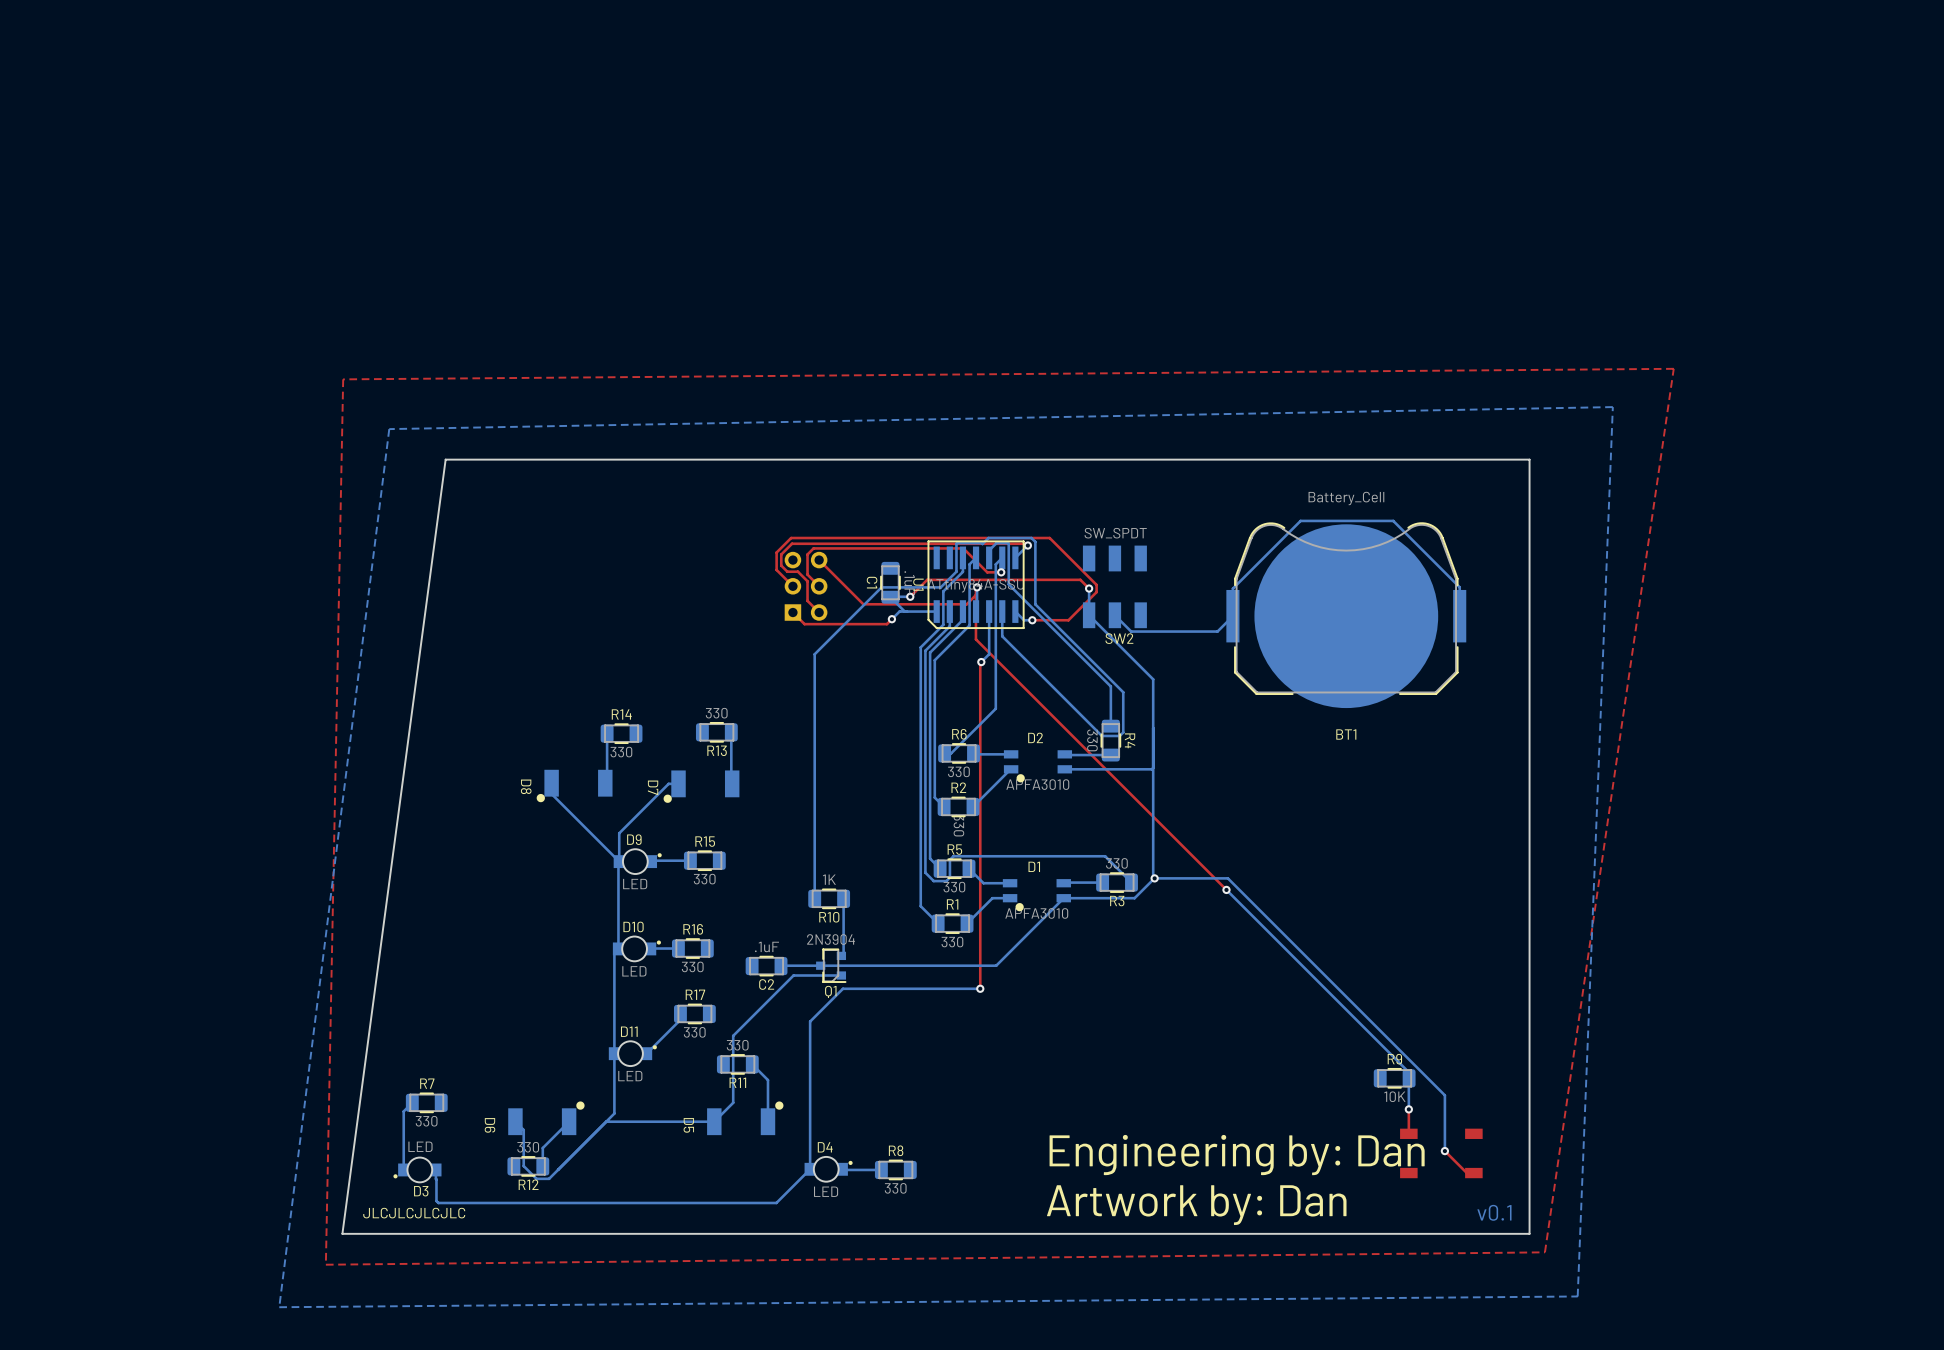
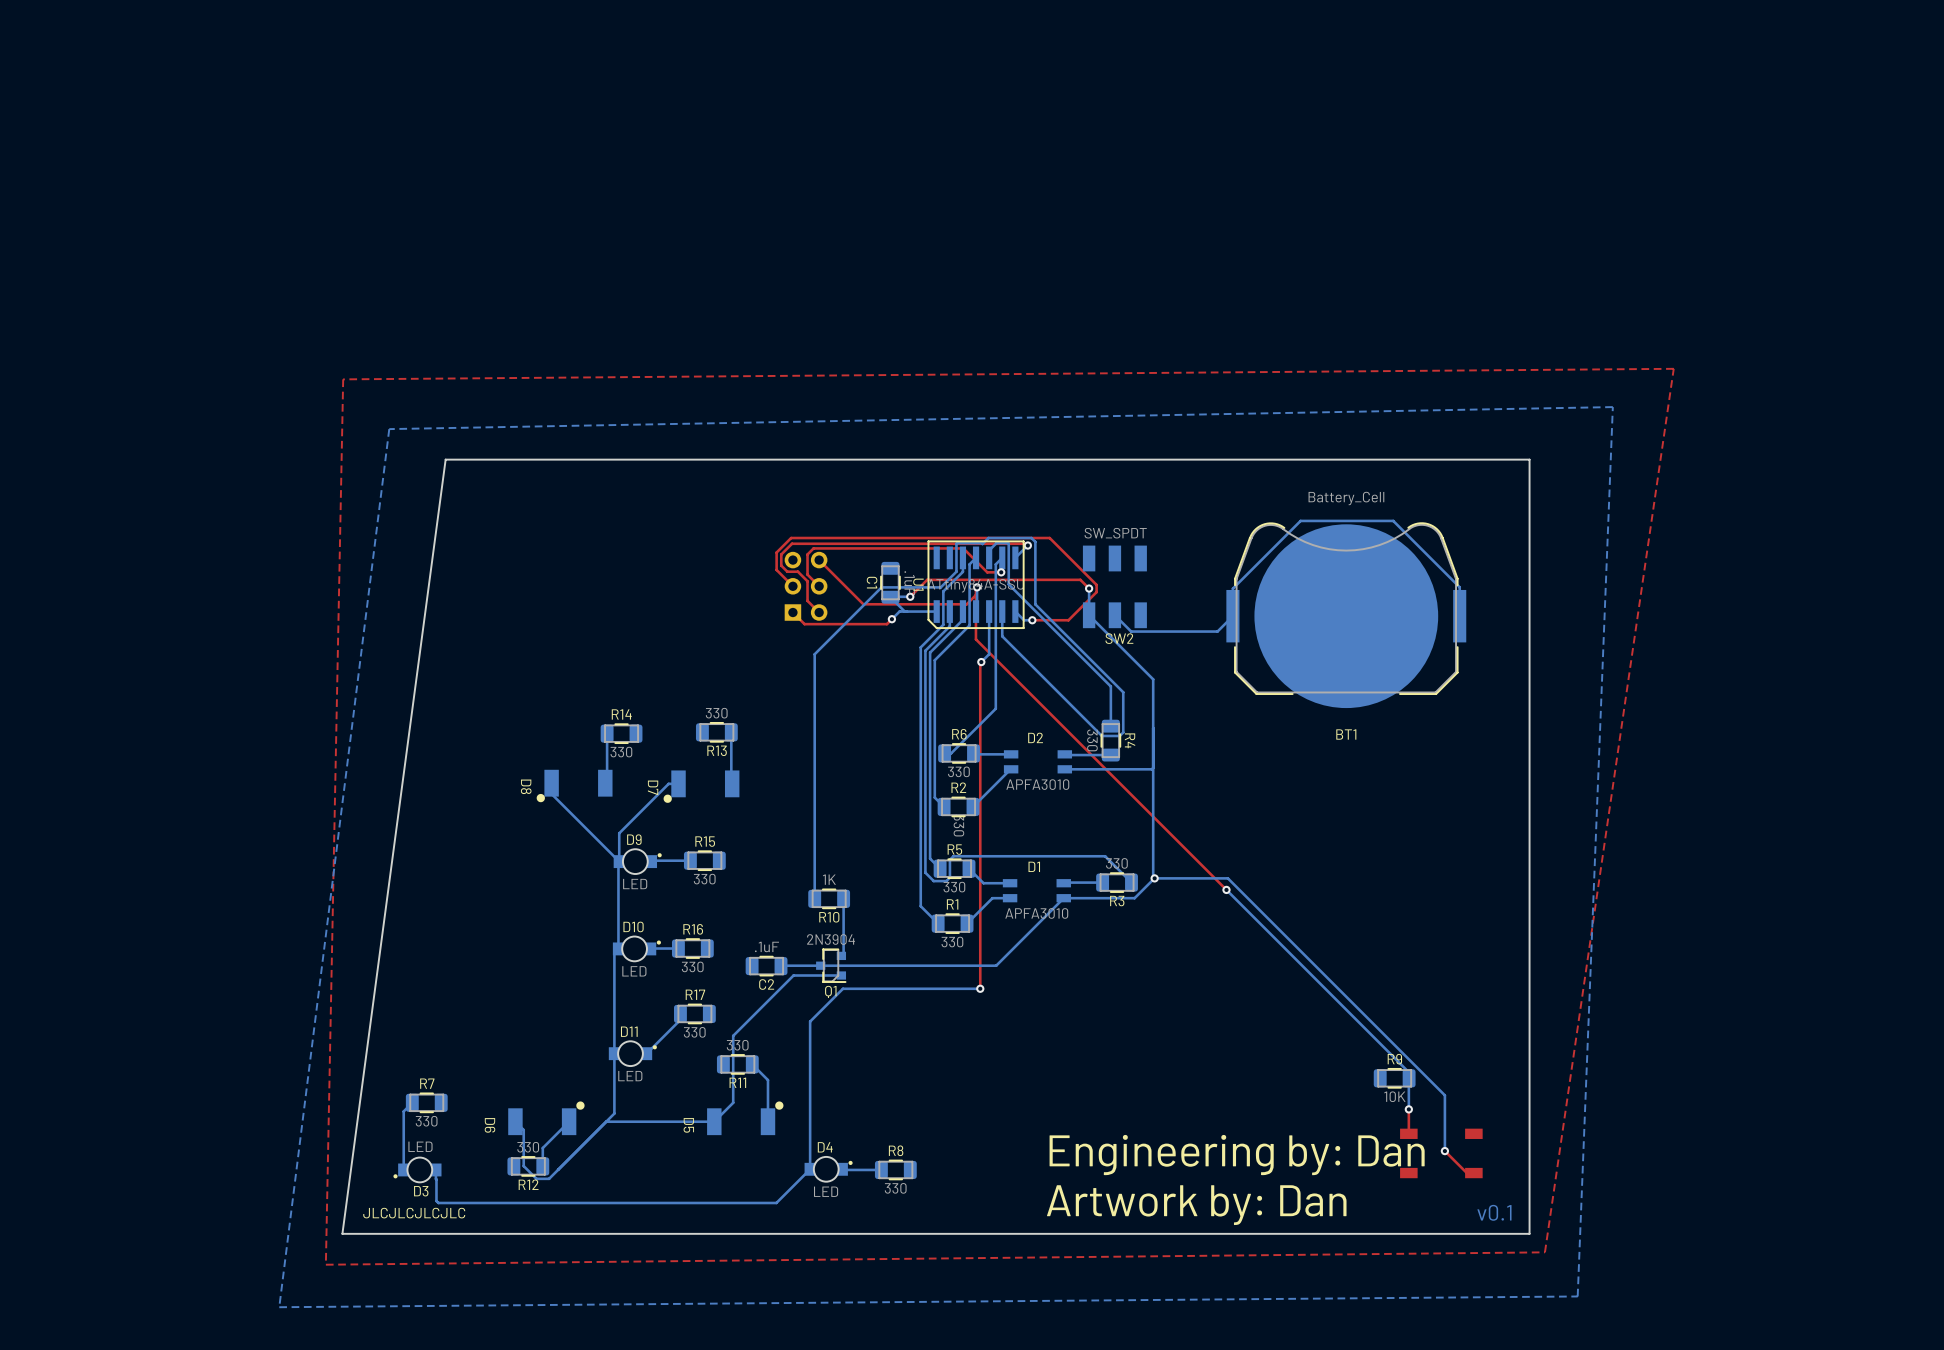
D2 footprint: [1003, 750, 1073, 783] -> [1003, 750, 1073, 774]
D1 footprint: [1002, 879, 1071, 912] -> [1002, 879, 1071, 903]

